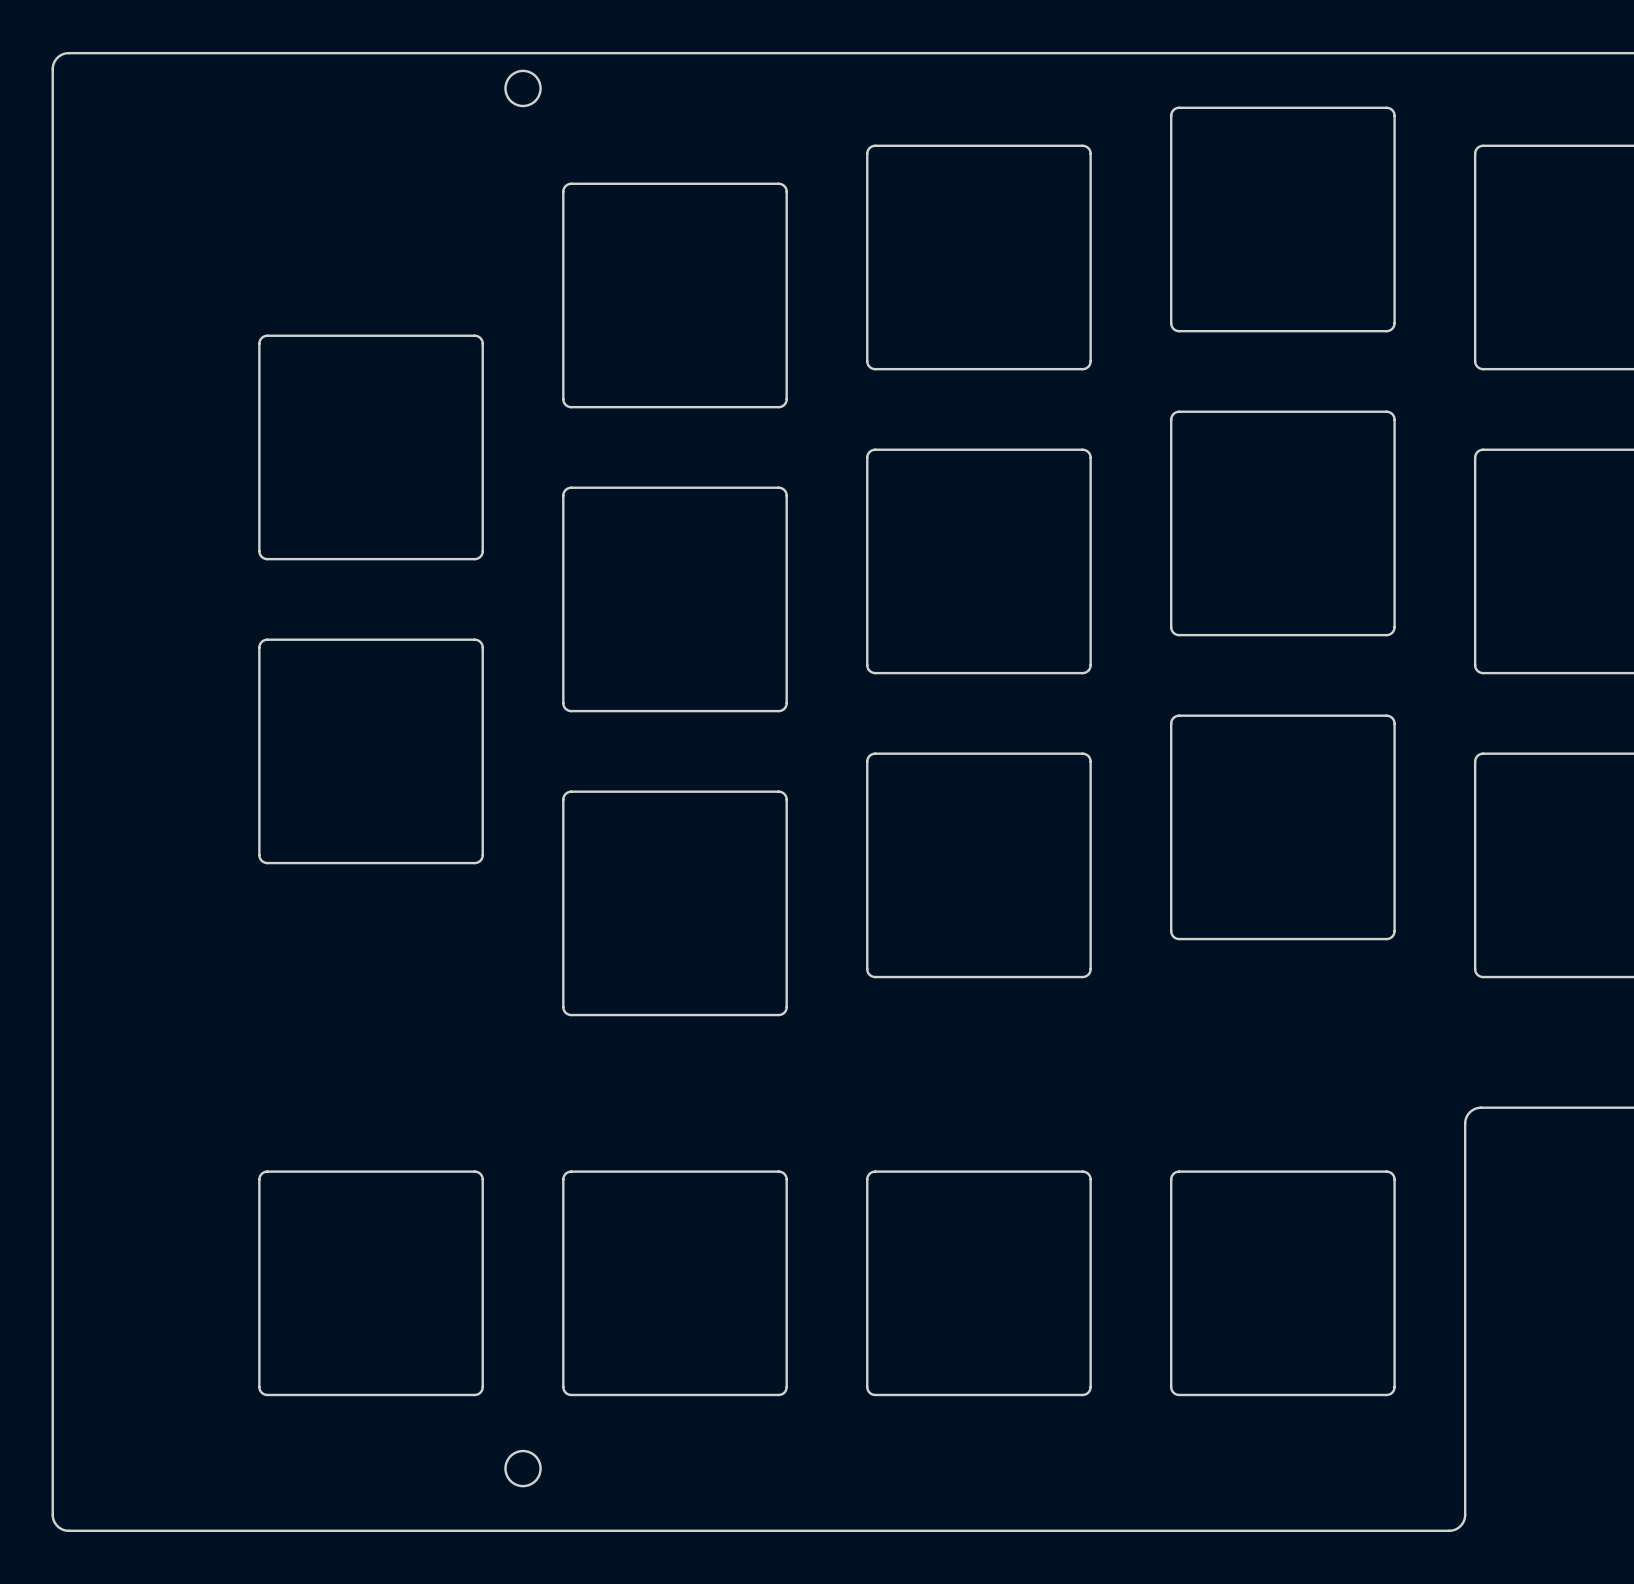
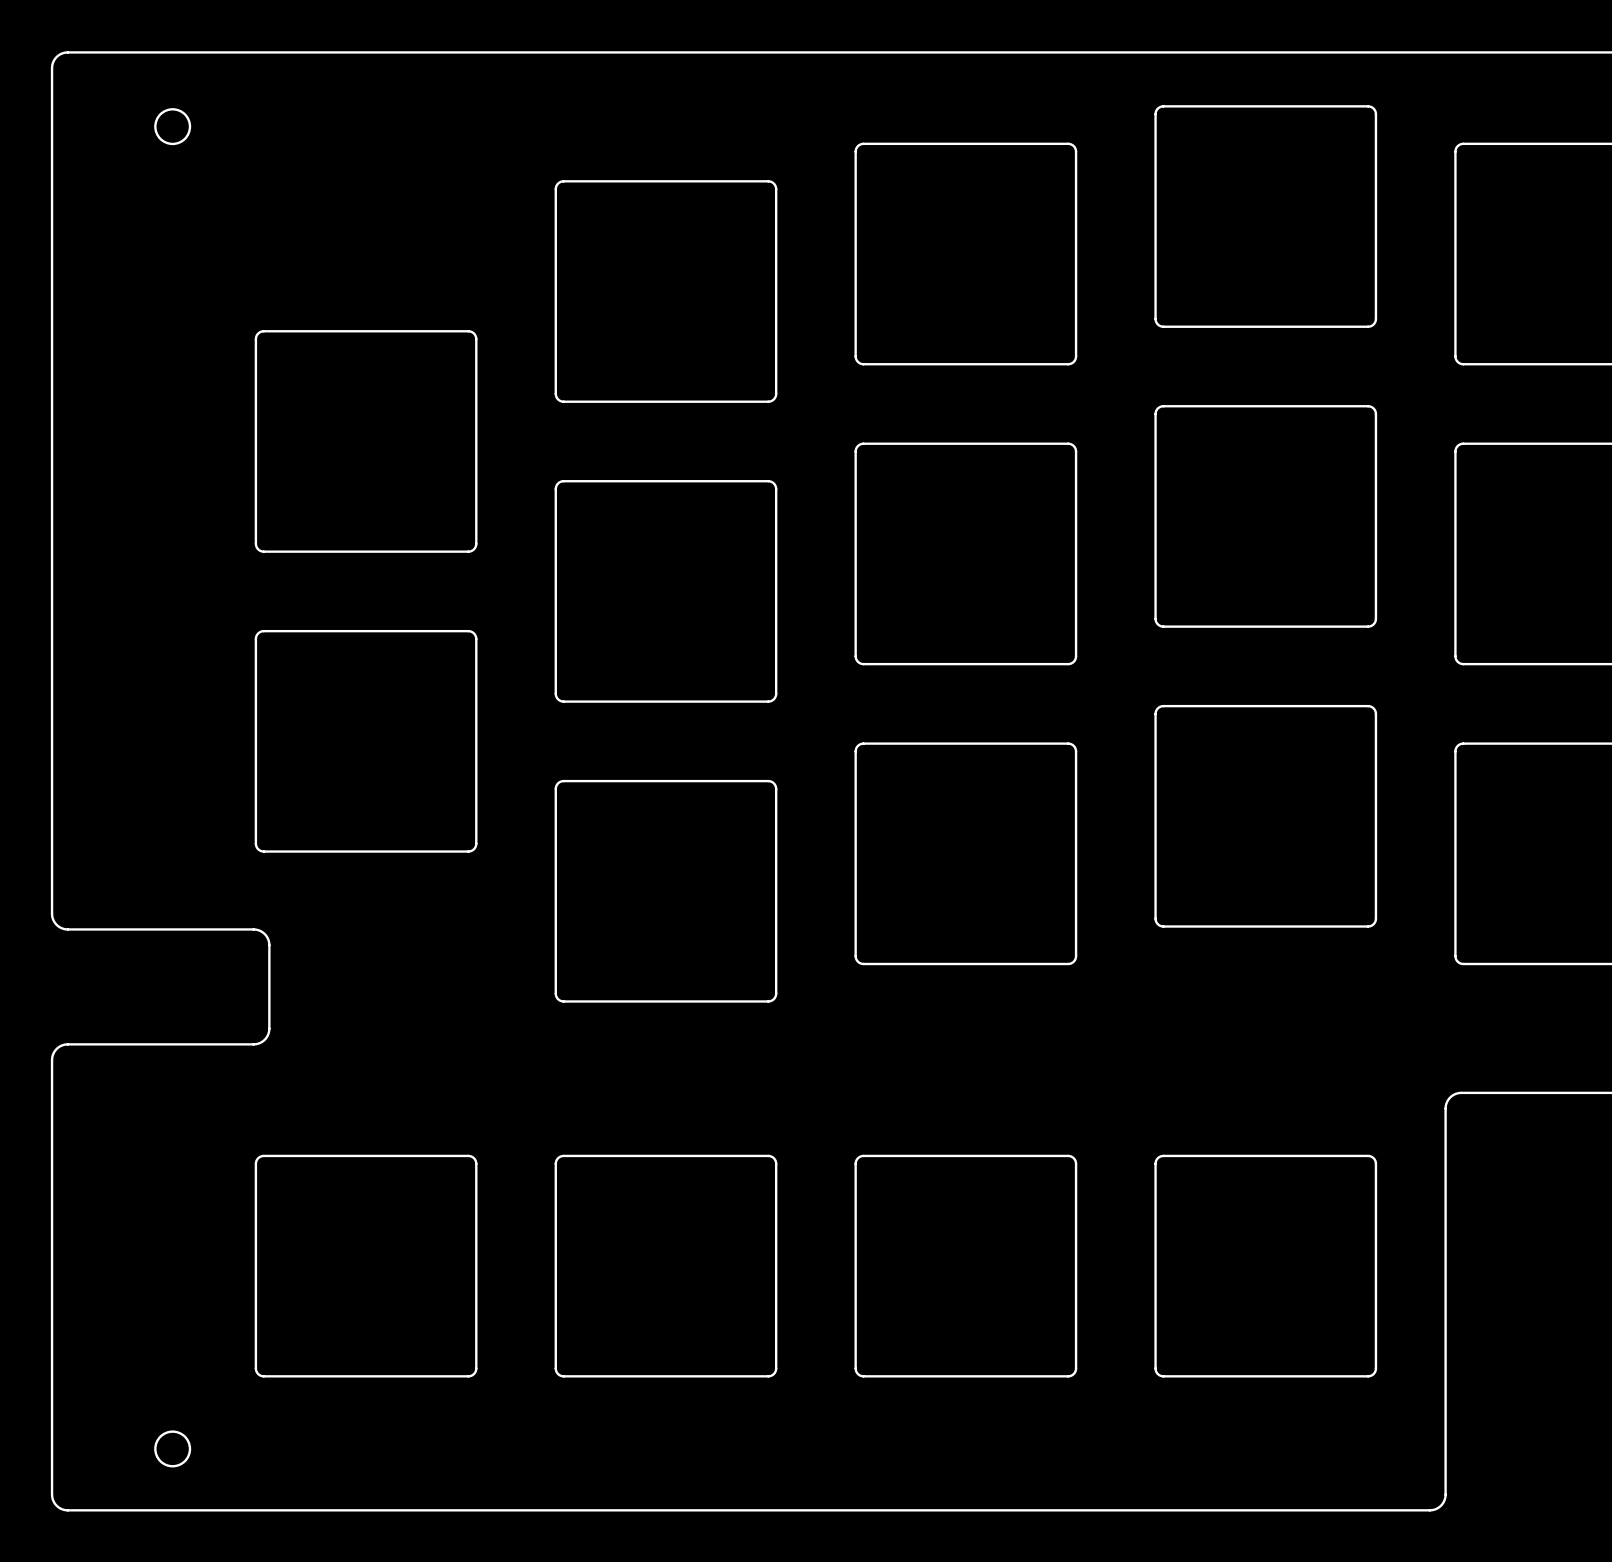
round board edge position: (523, 88) -> (172, 126)
board edge: (52, 926) (52, 1074) -> (52, 913) (56, 924) (66, 929) (255, 929) (265, 935) (269, 945) (269, 1030) (265, 1038) (260, 1042) (253, 1044) (66, 1044) (56, 1048) (52, 1060)
round board edge position: (523, 1468) -> (172, 1448)

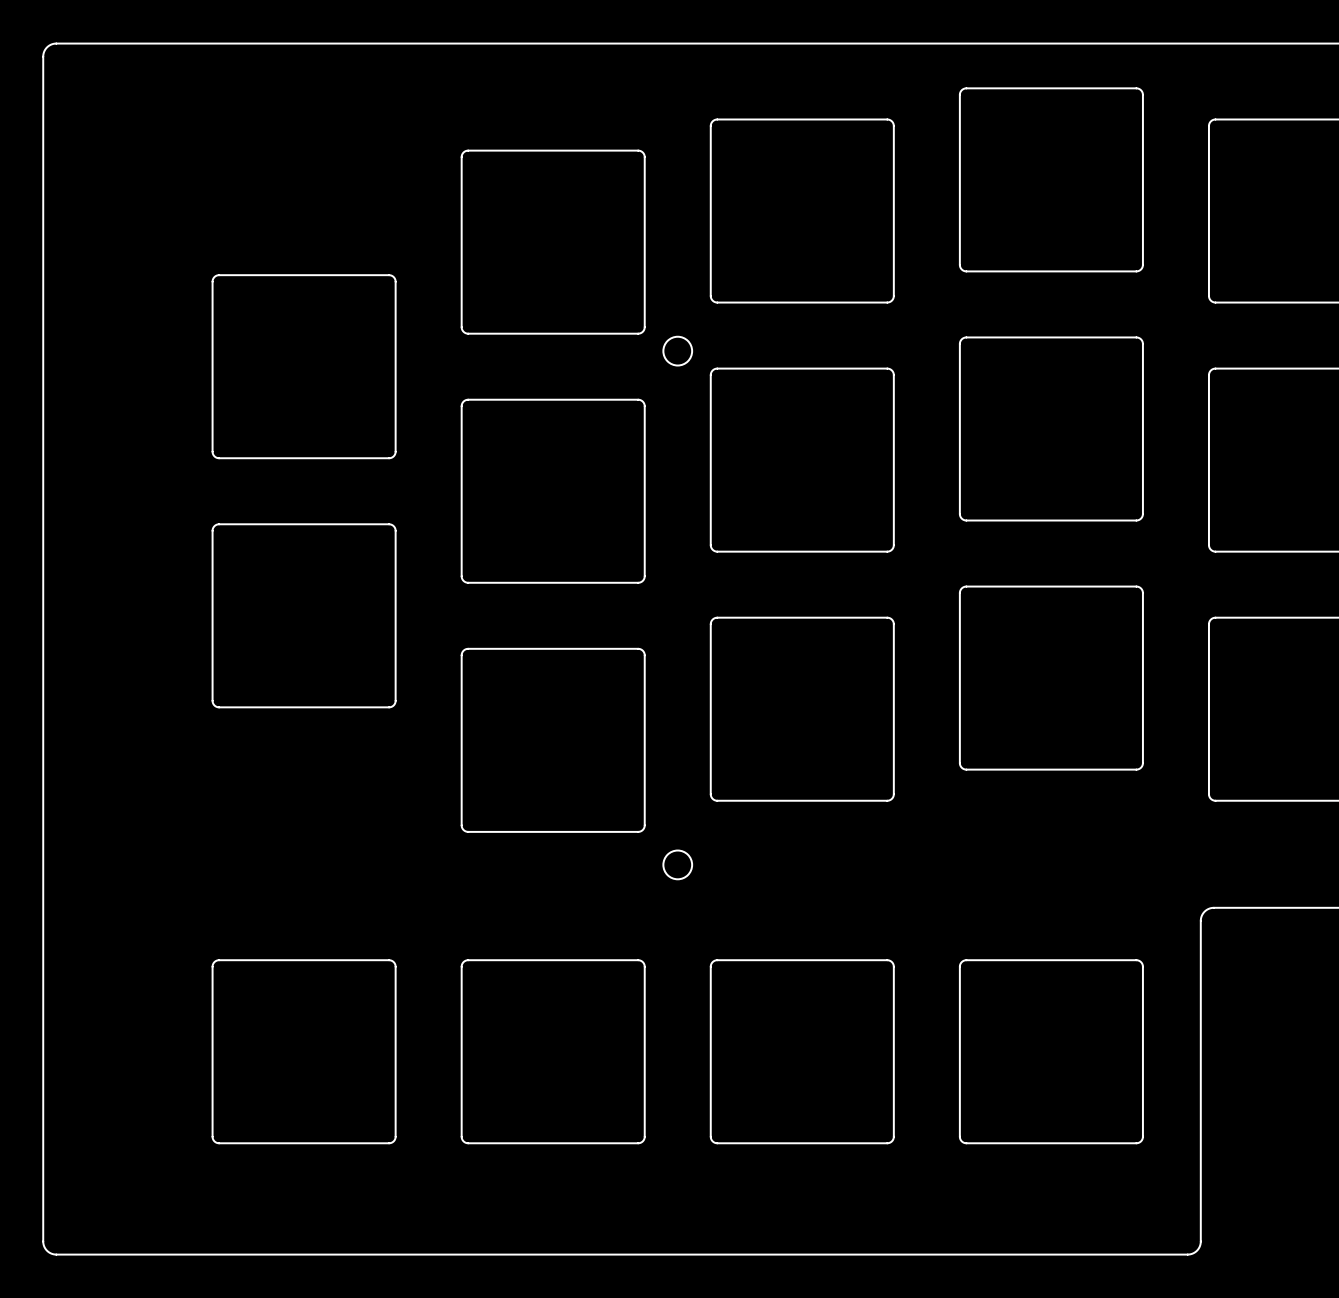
round board edge: [154, 108, 192, 146] -> none
round board edge: none -> [662, 335, 694, 367]
board edge: (52, 913) (56, 924) (66, 929) (255, 929) (265, 935) (269, 945) (269, 1030) (265, 1038) (260, 1042) (253, 1044) (66, 1044) (56, 1048) (52, 1060) -> (43, 758) (43, 880)
round board edge: none -> [662, 849, 694, 881]
round board edge: [154, 1430, 192, 1468] -> none

